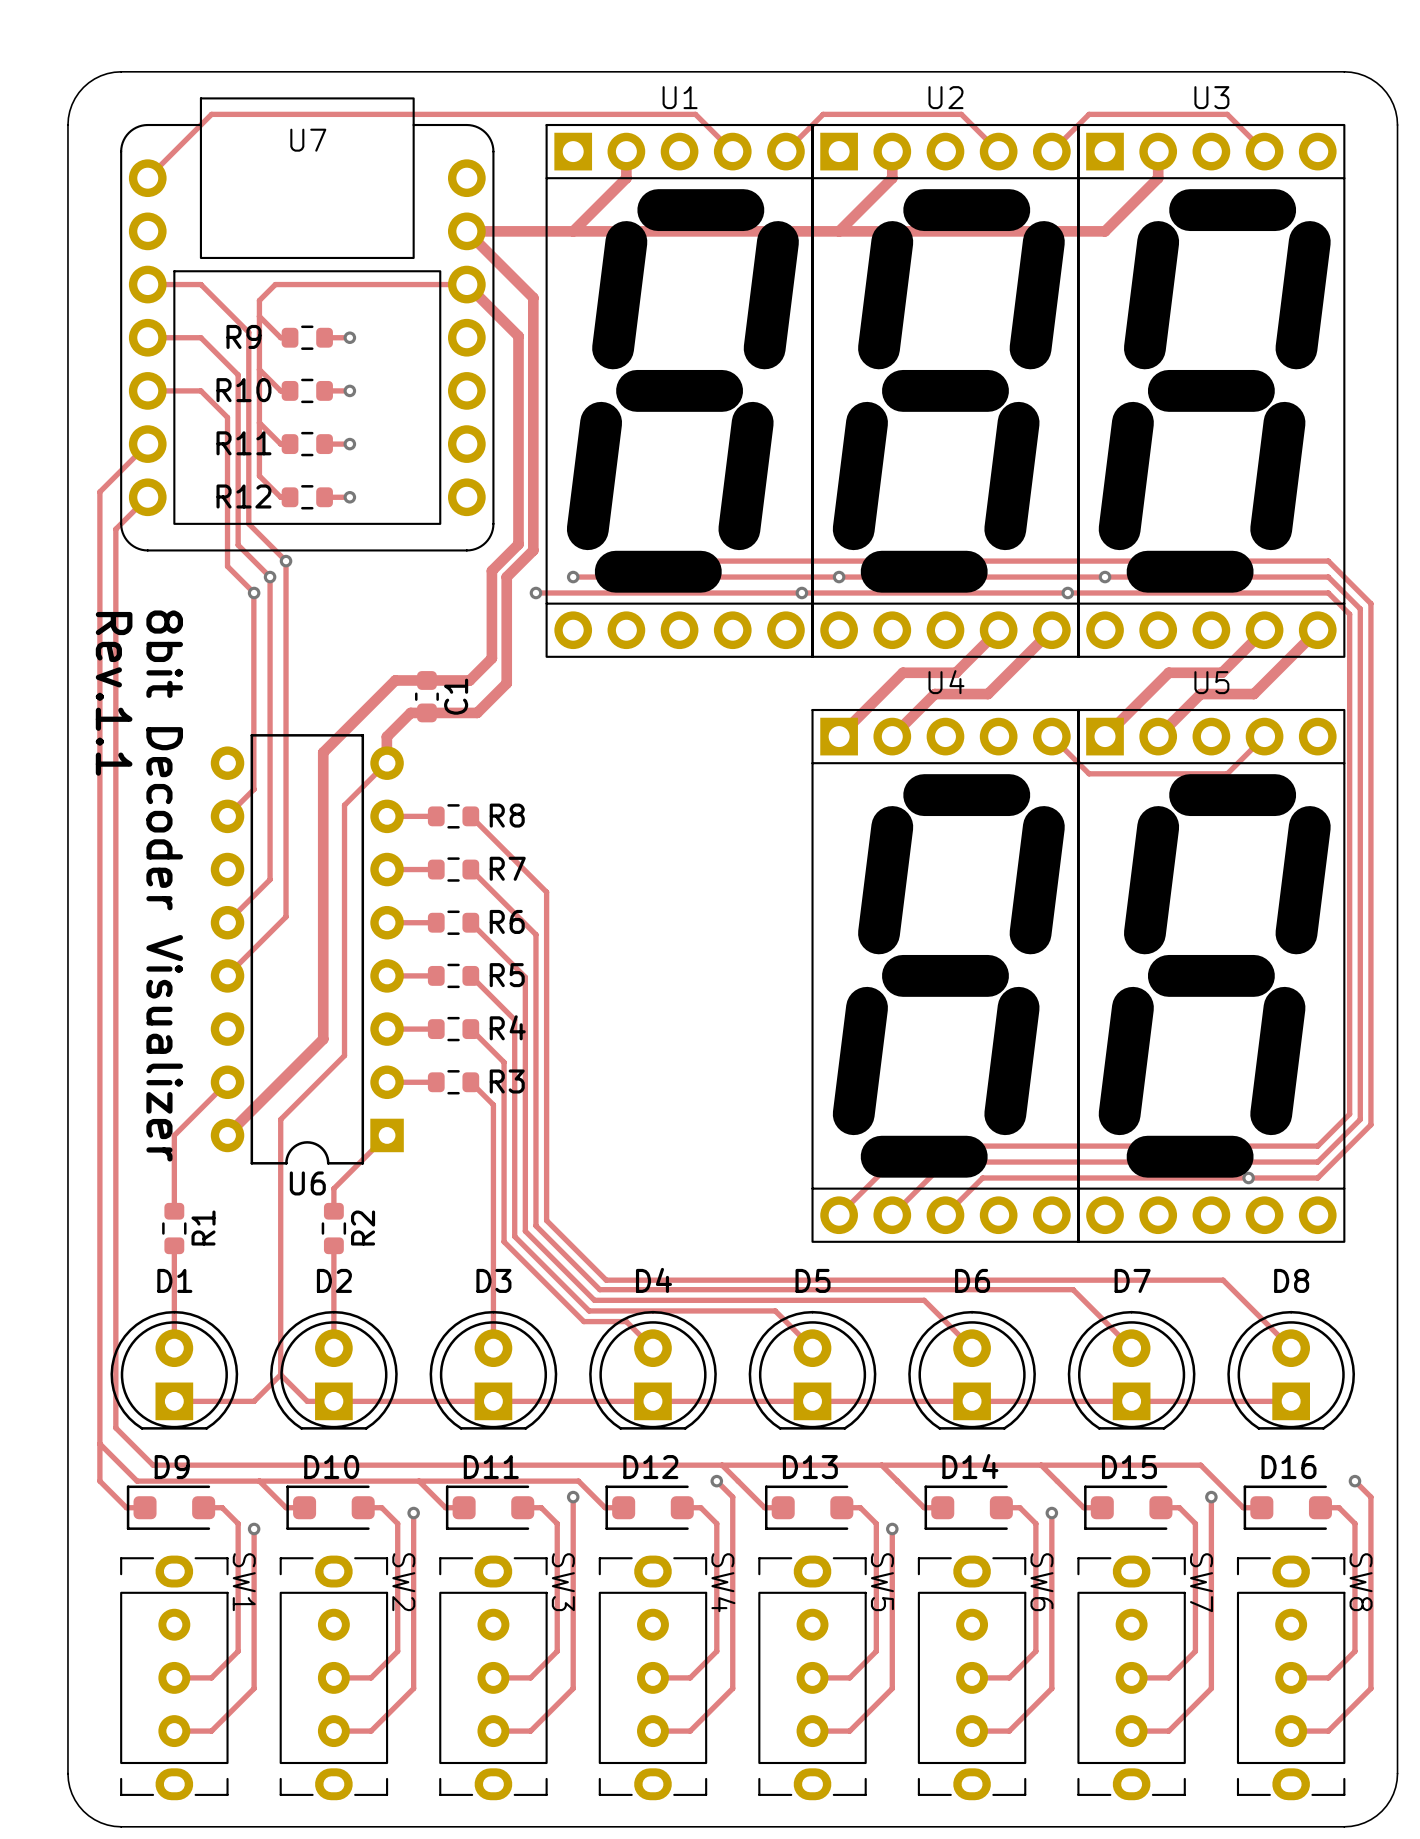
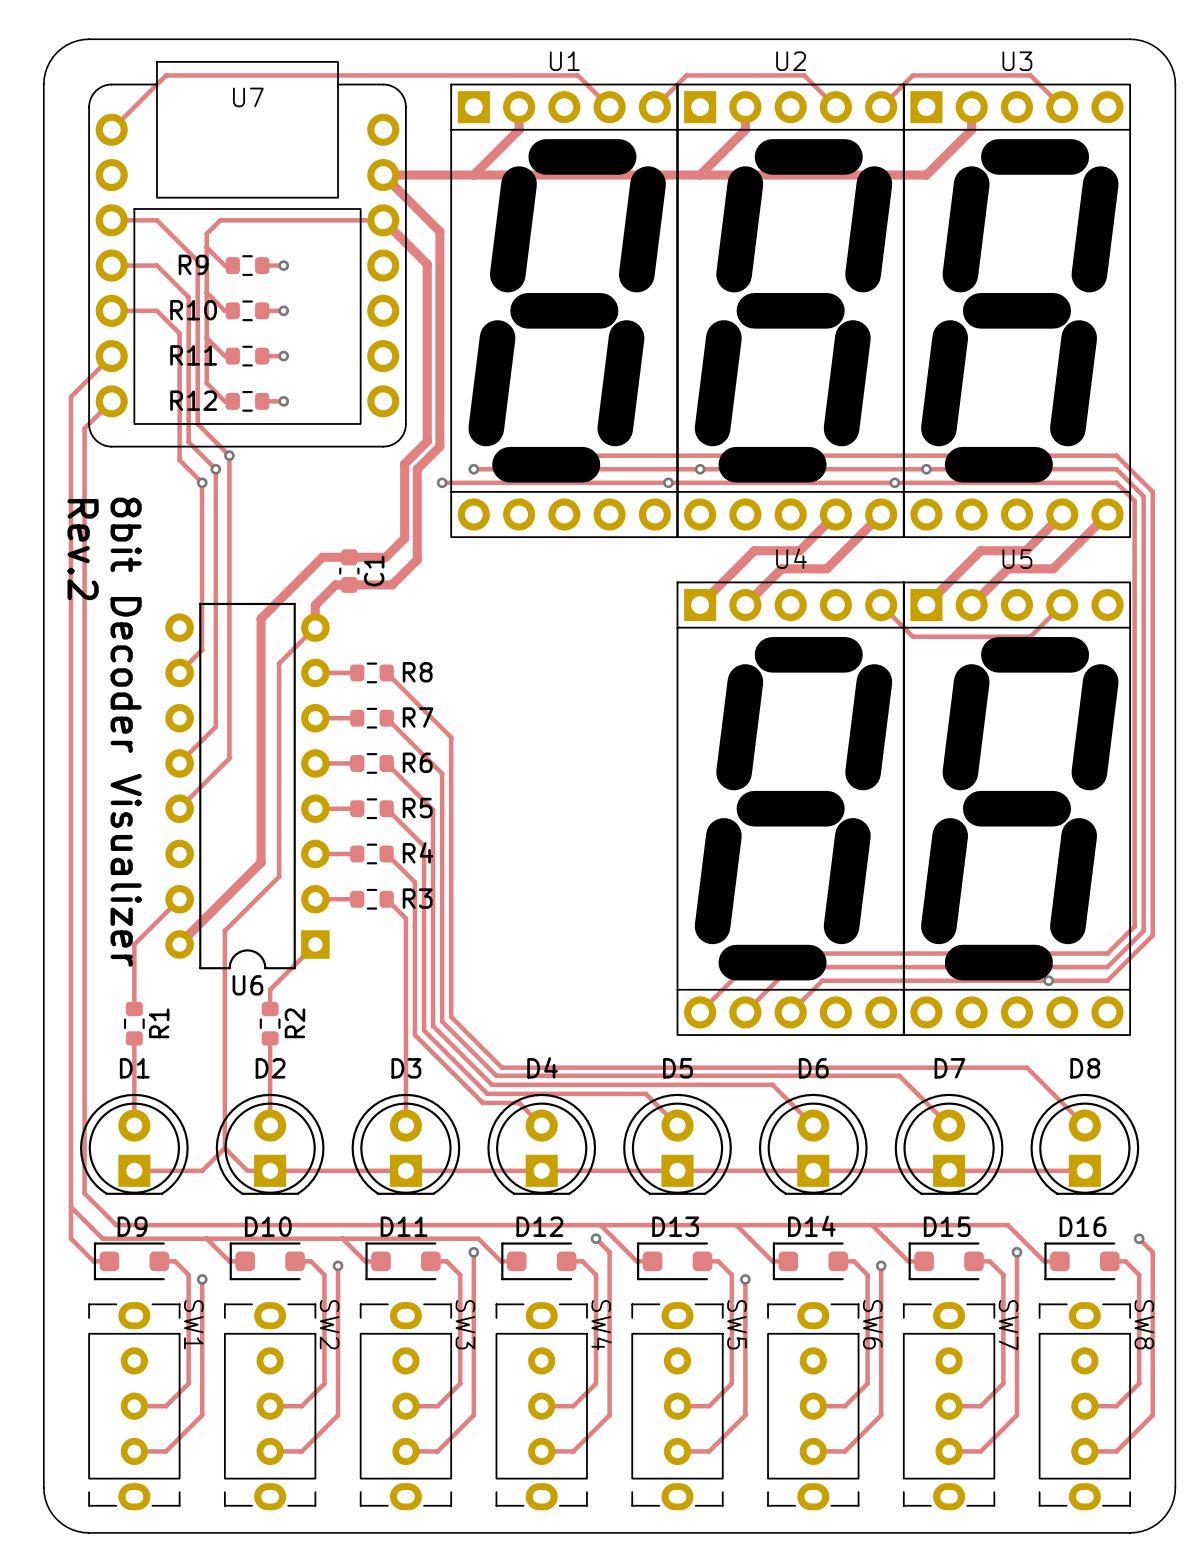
text: Rev.1.1 (114, 693) -> Rev.2 (83, 549)

